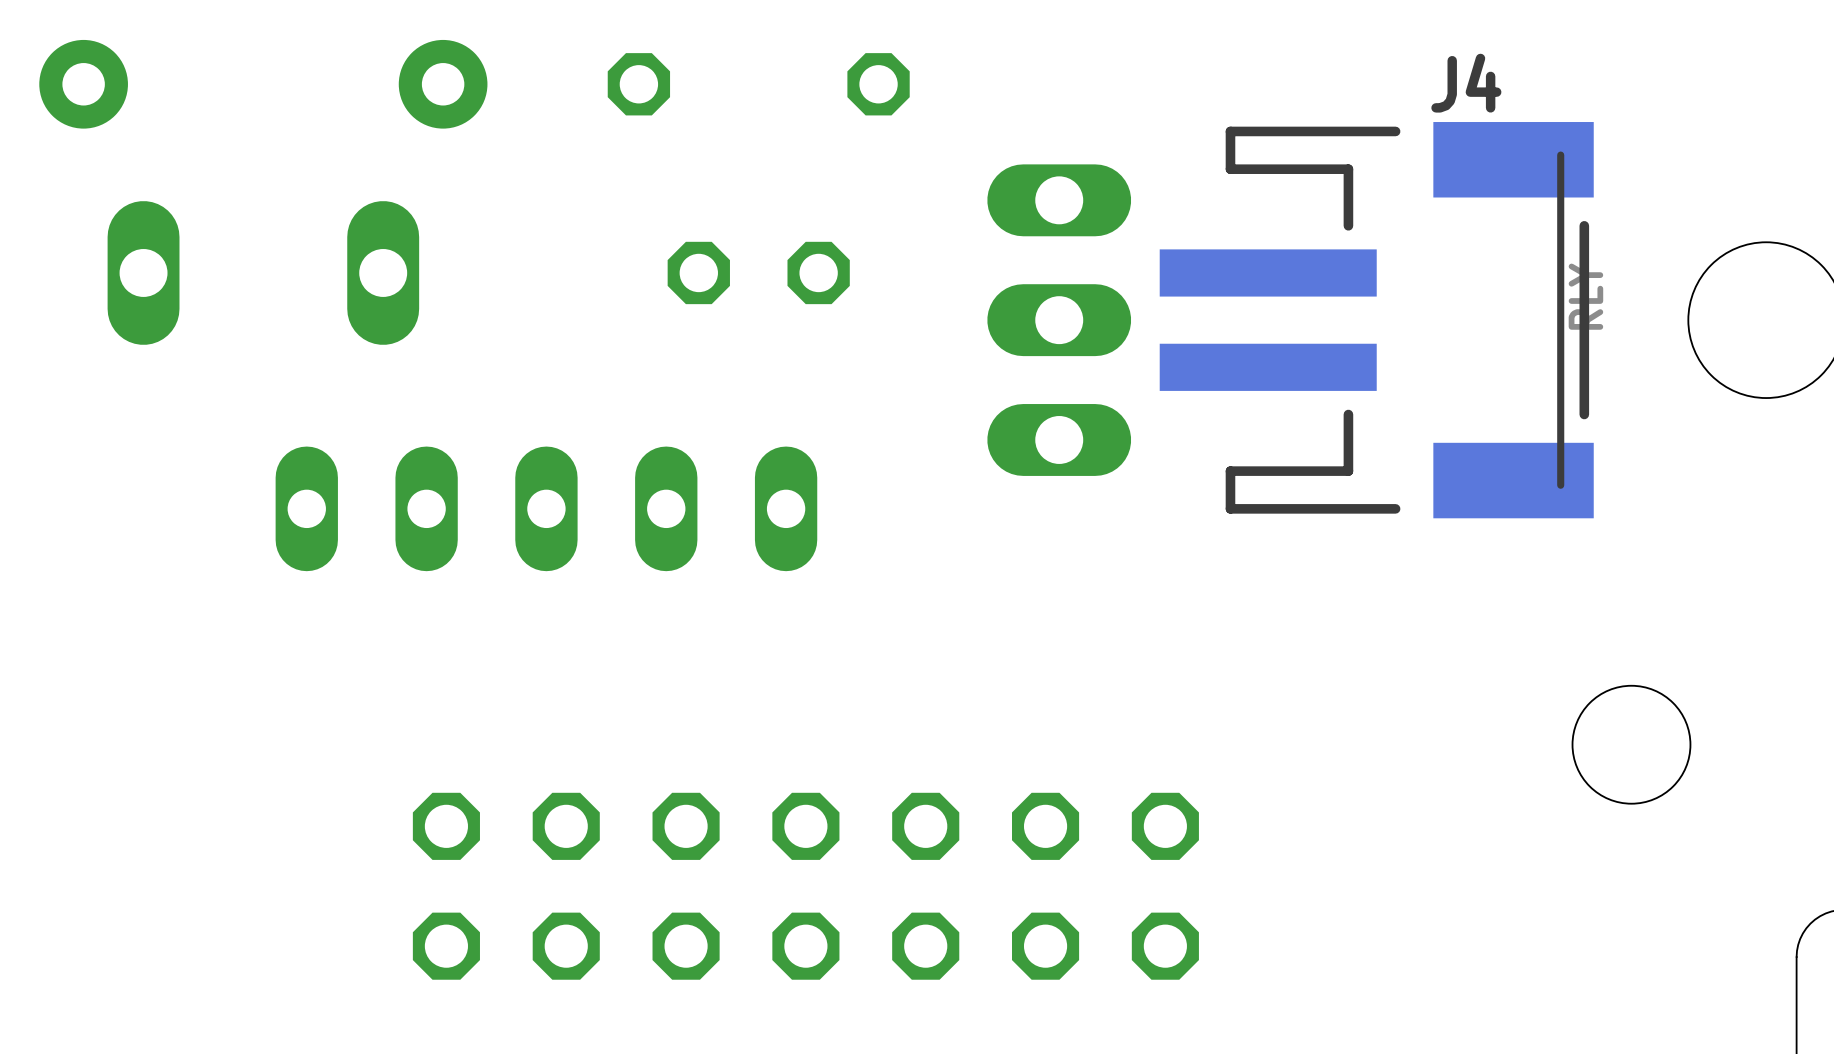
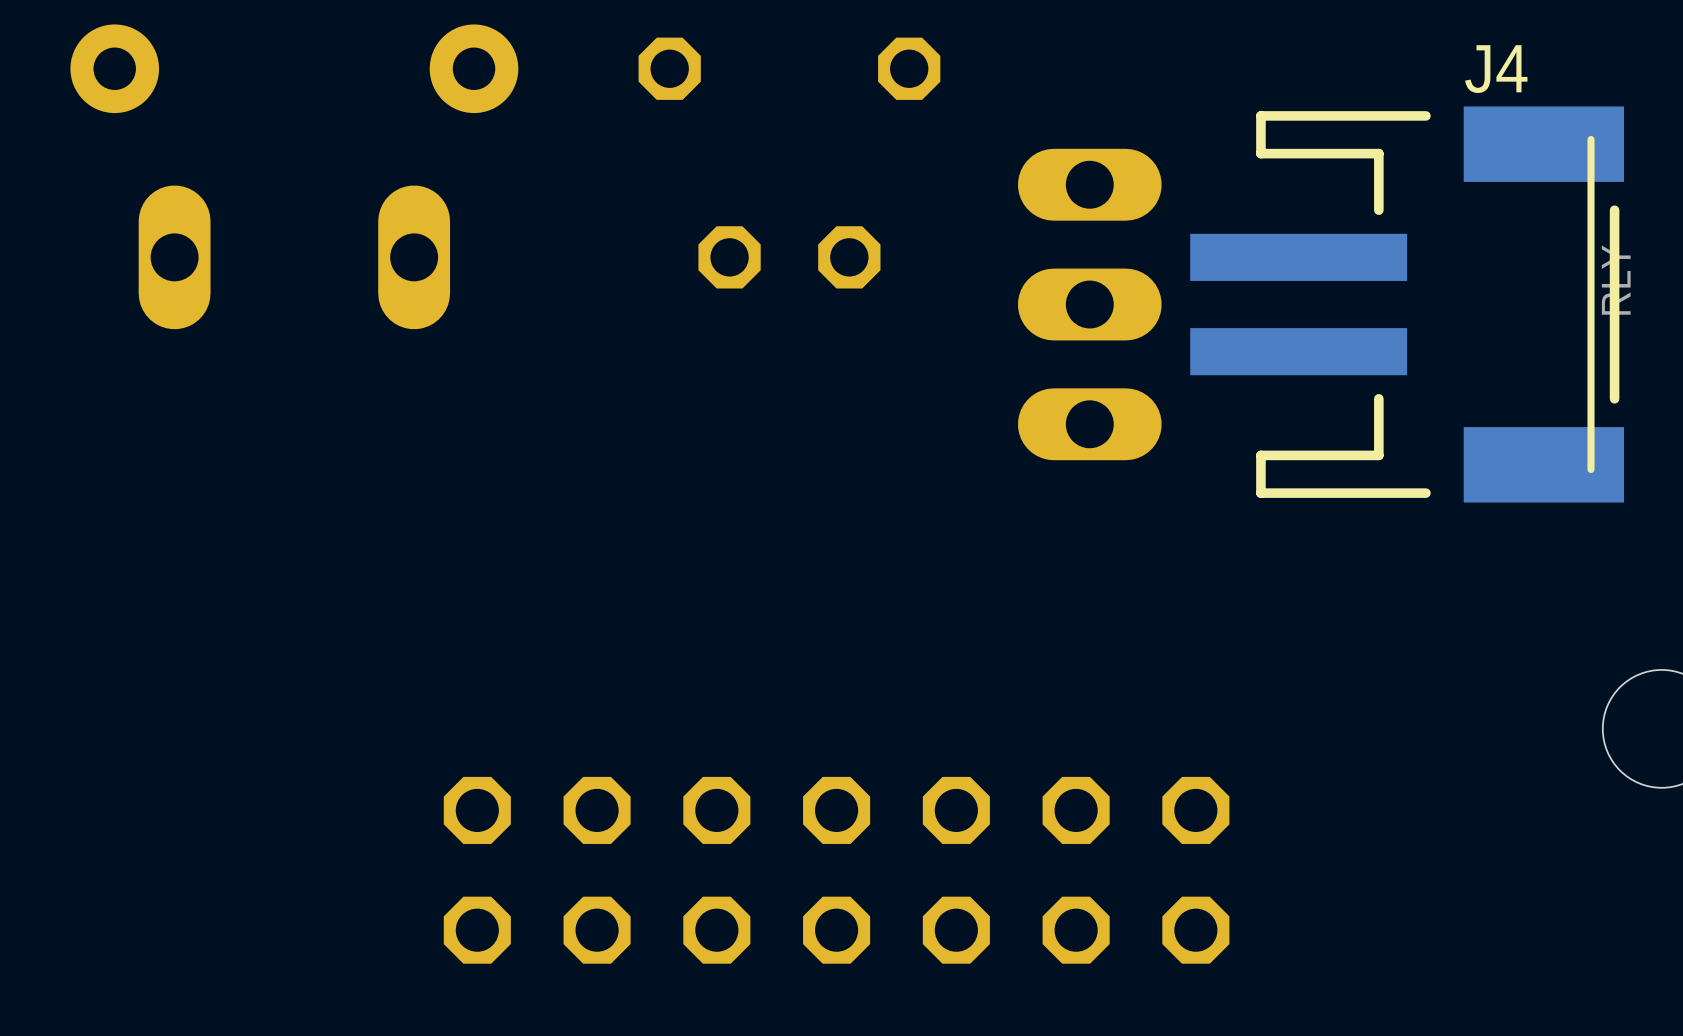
part: (546, 508) -> none

